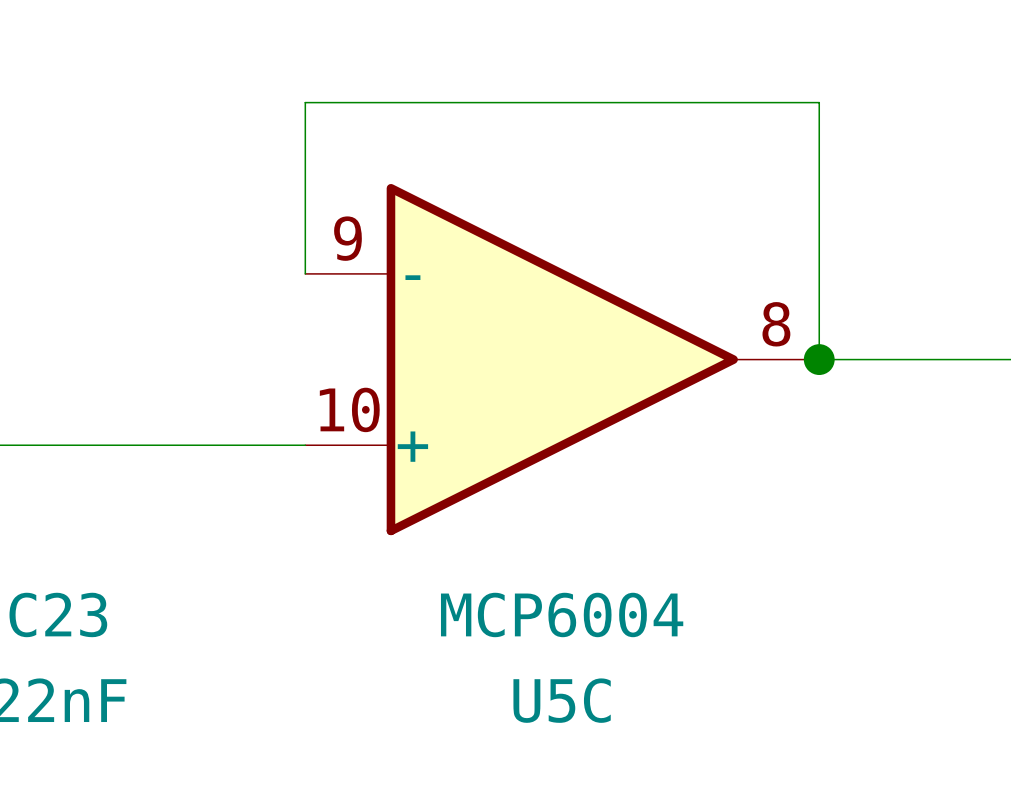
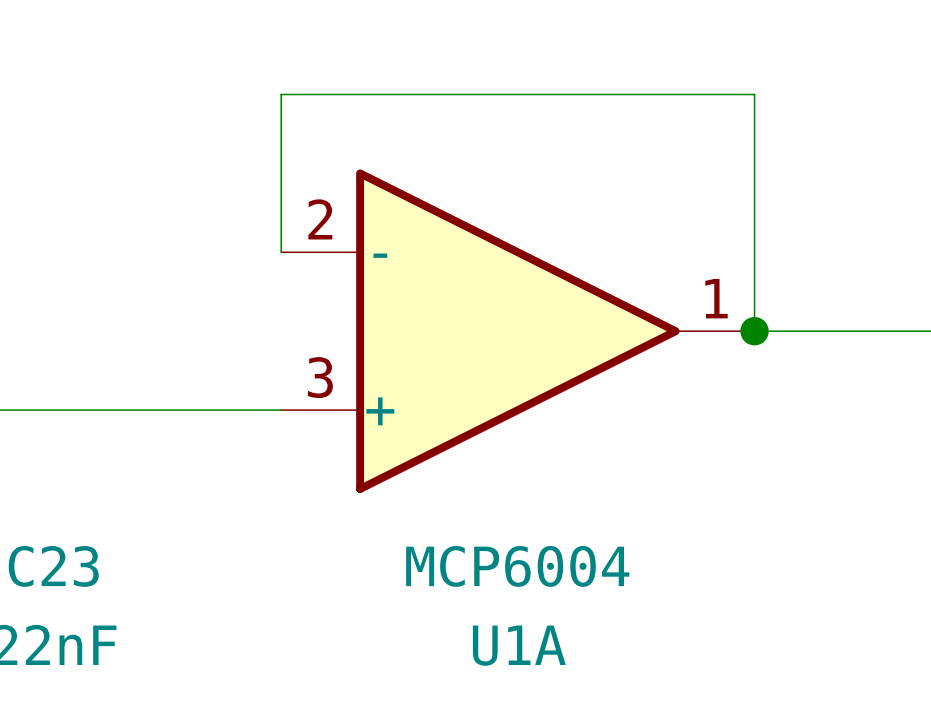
U5C pin number: 9 (347, 238) -> 2 (320, 219)
U5C pin number: 8 (776, 324) -> 1 (716, 298)
U5C pin number: 10 (349, 409) -> 3 (320, 377)
U5C name: U5C (562, 700) -> U1A (519, 645)

